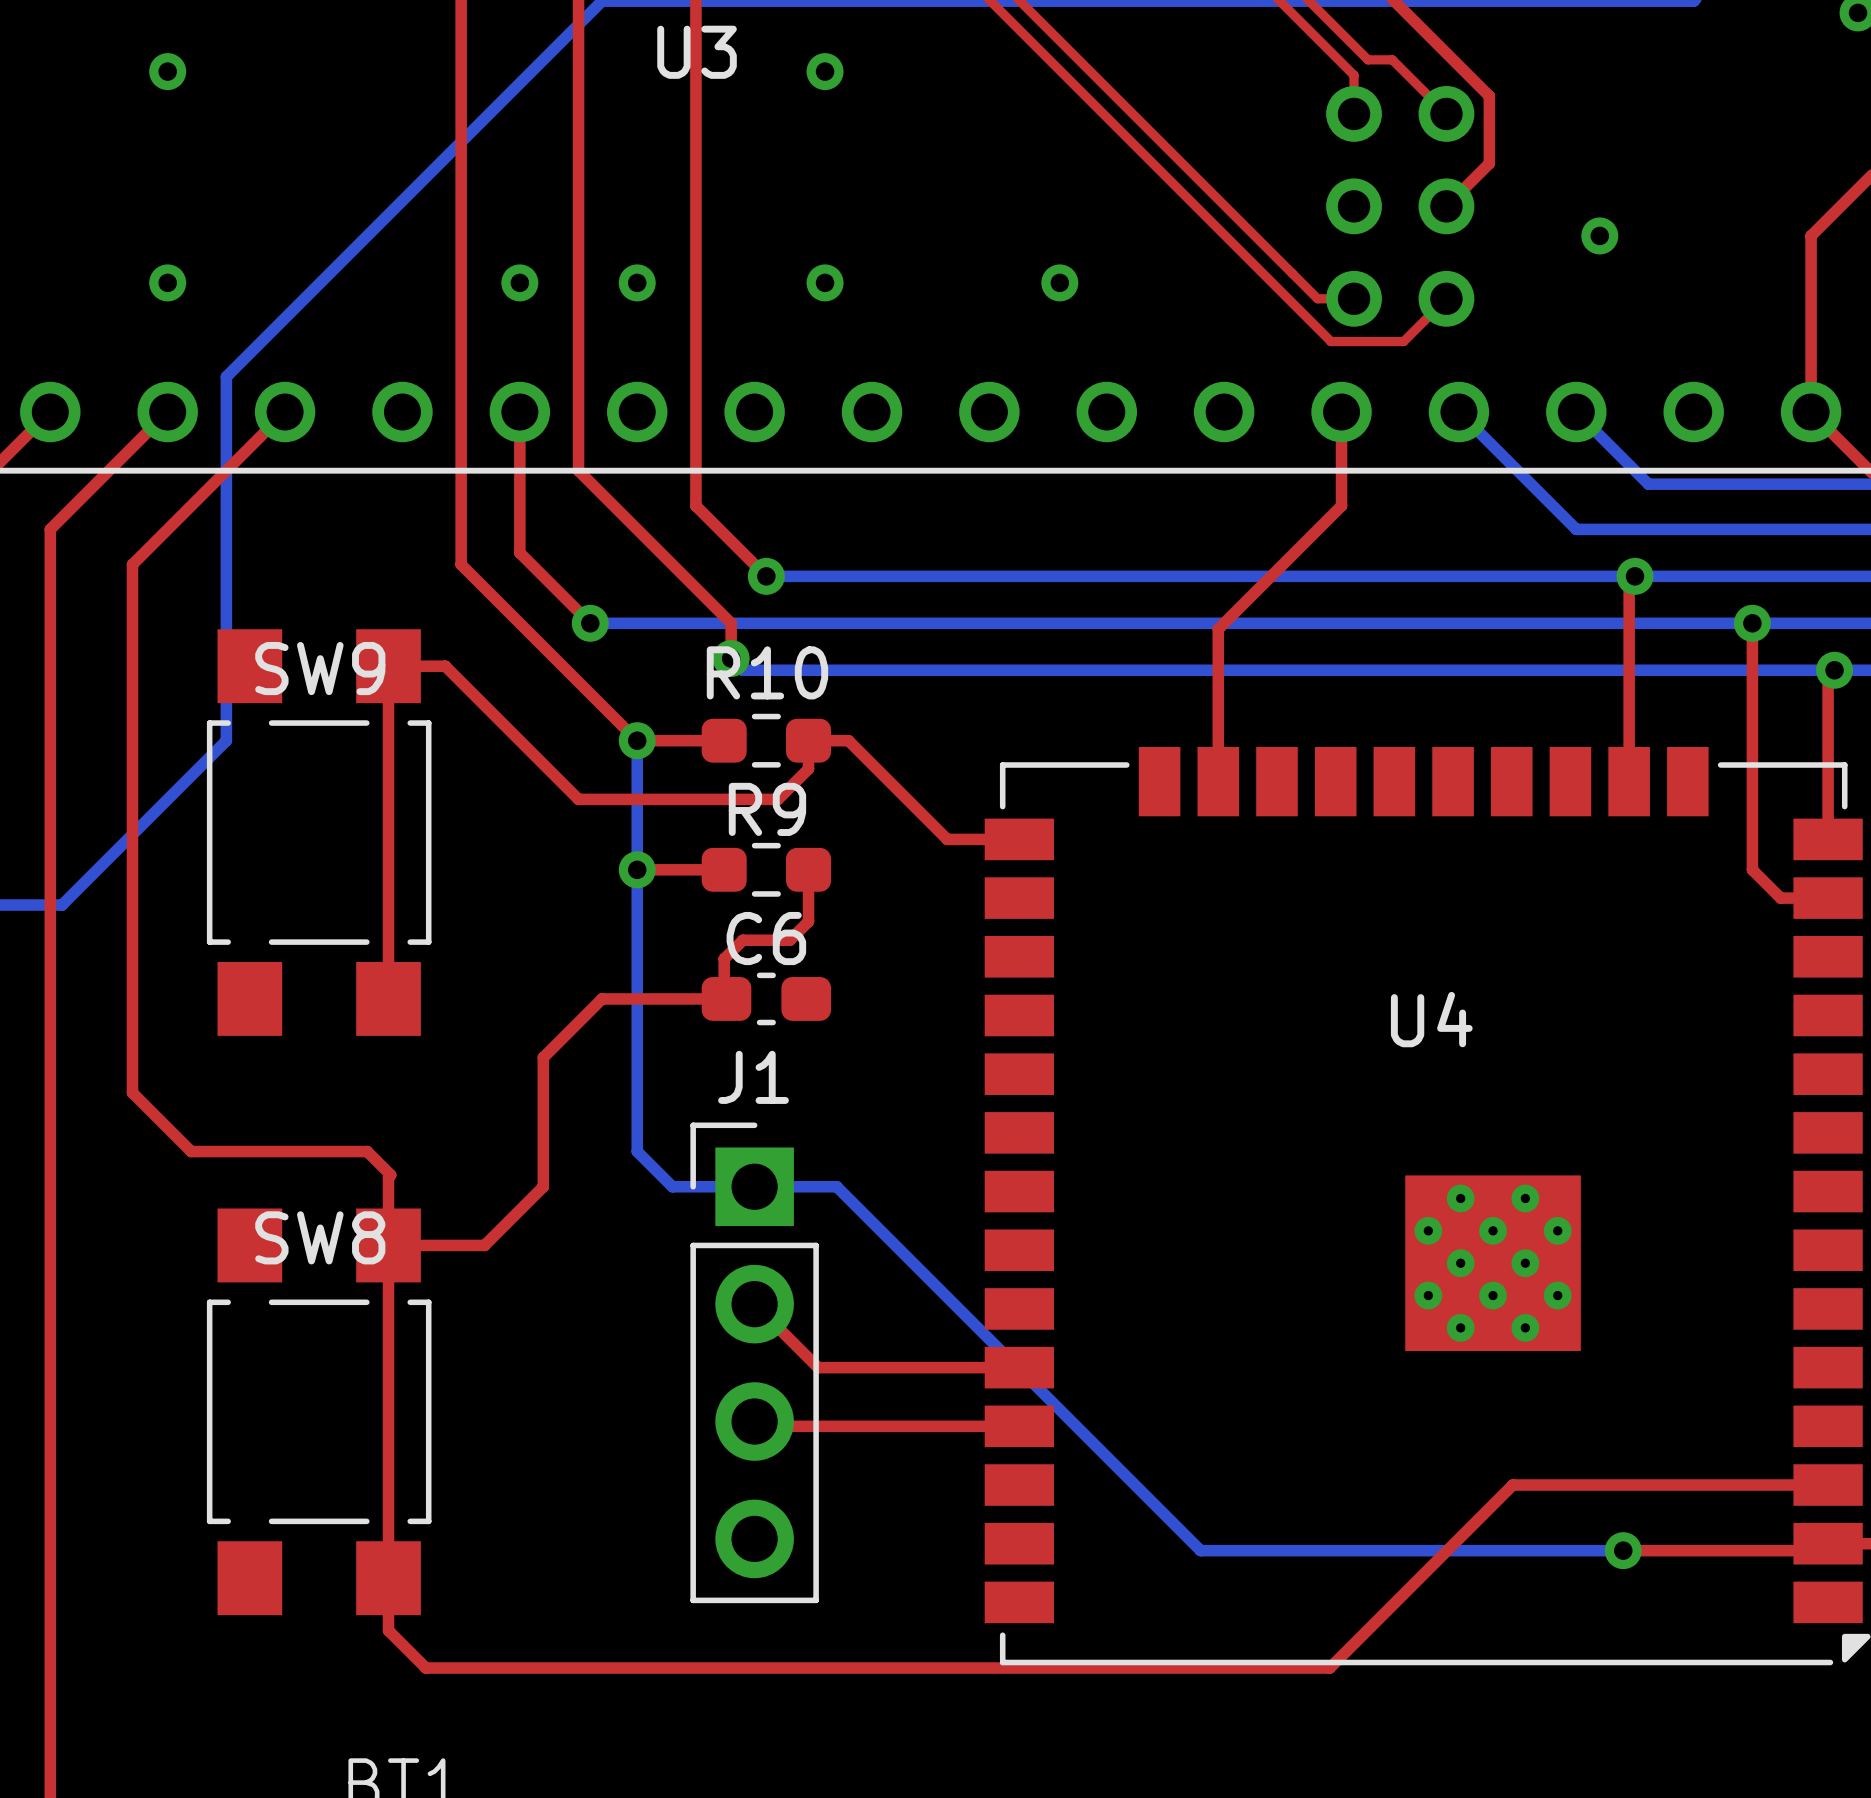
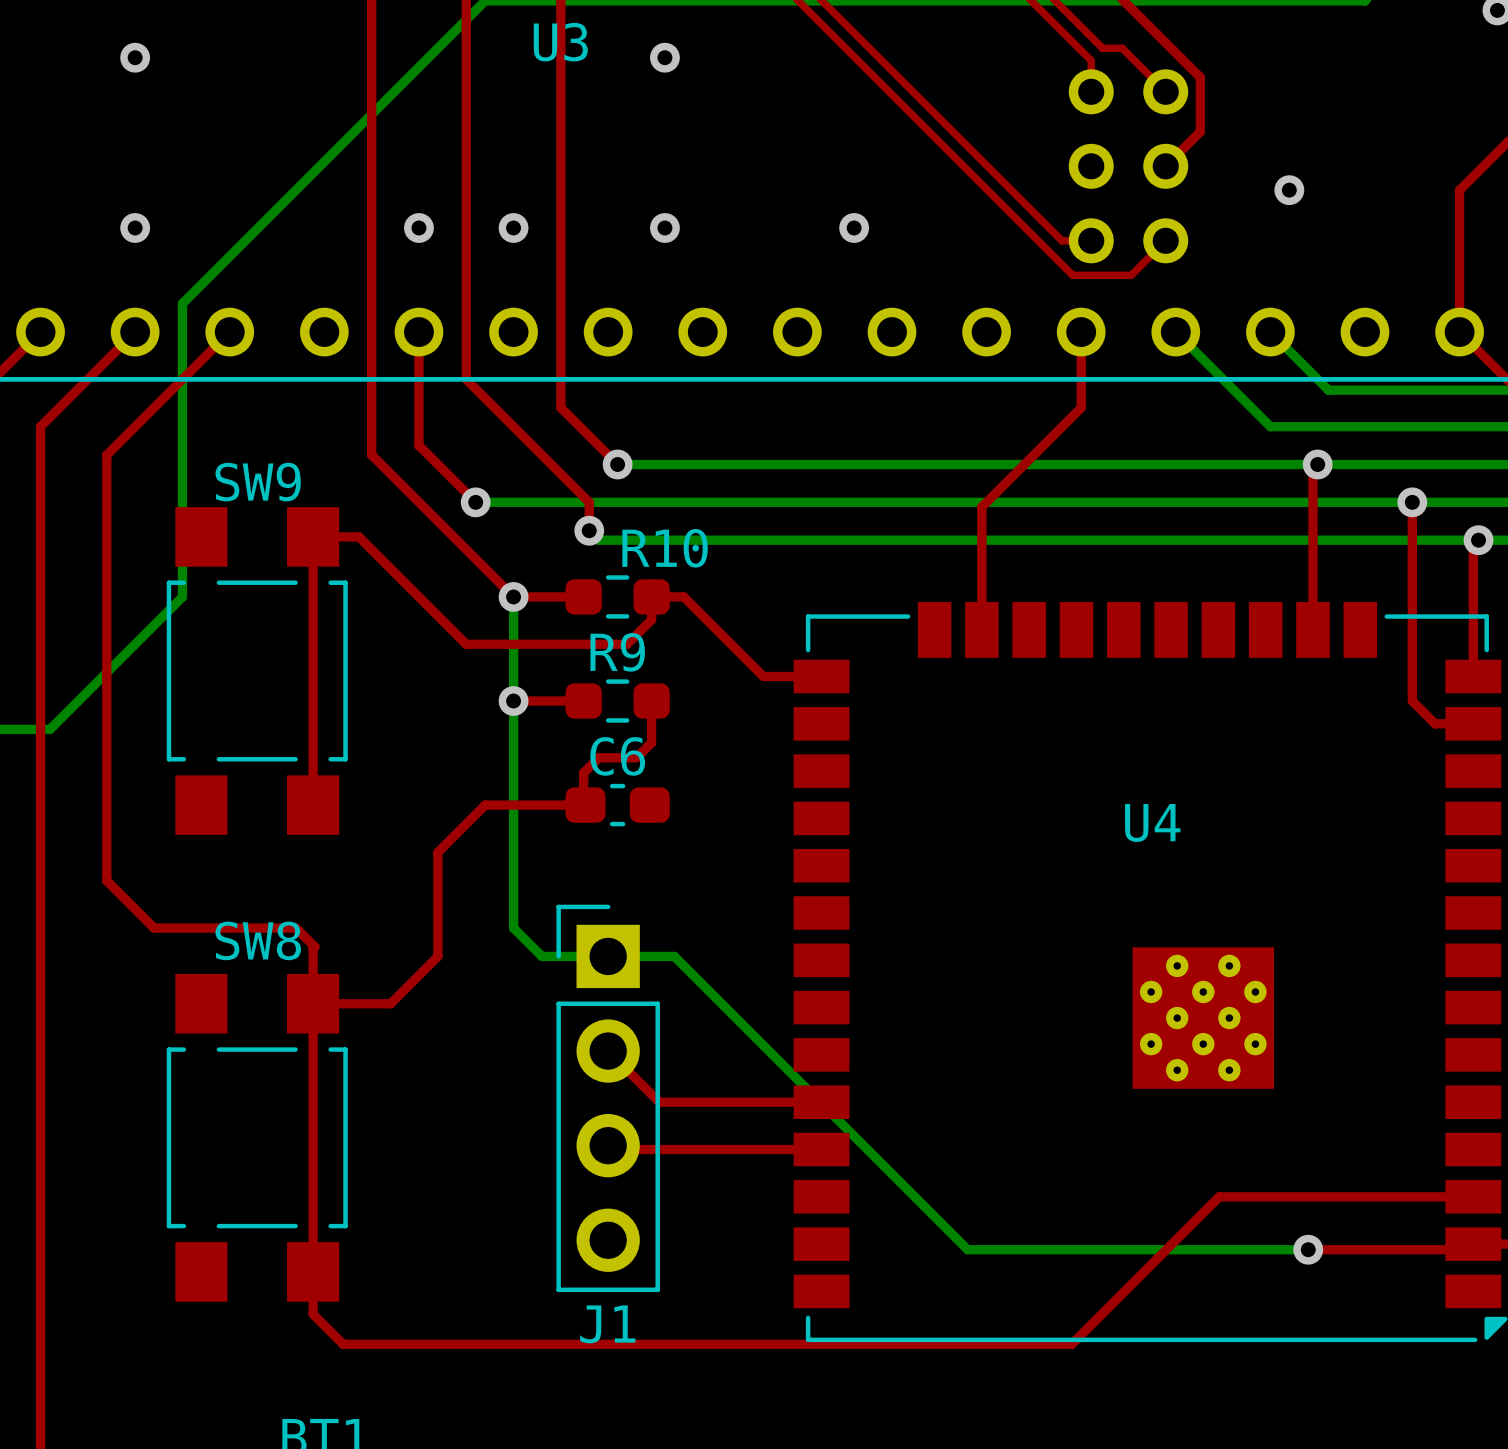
SW9 name position: SW9 (320, 668) -> SW9 (258, 482)
R10 name position: R10 (767, 672) -> R10 (665, 548)
J1 name position: J1 (753, 1077) -> J1 (607, 1324)
SW8 name position: SW8 (320, 1237) -> SW8 (258, 940)

